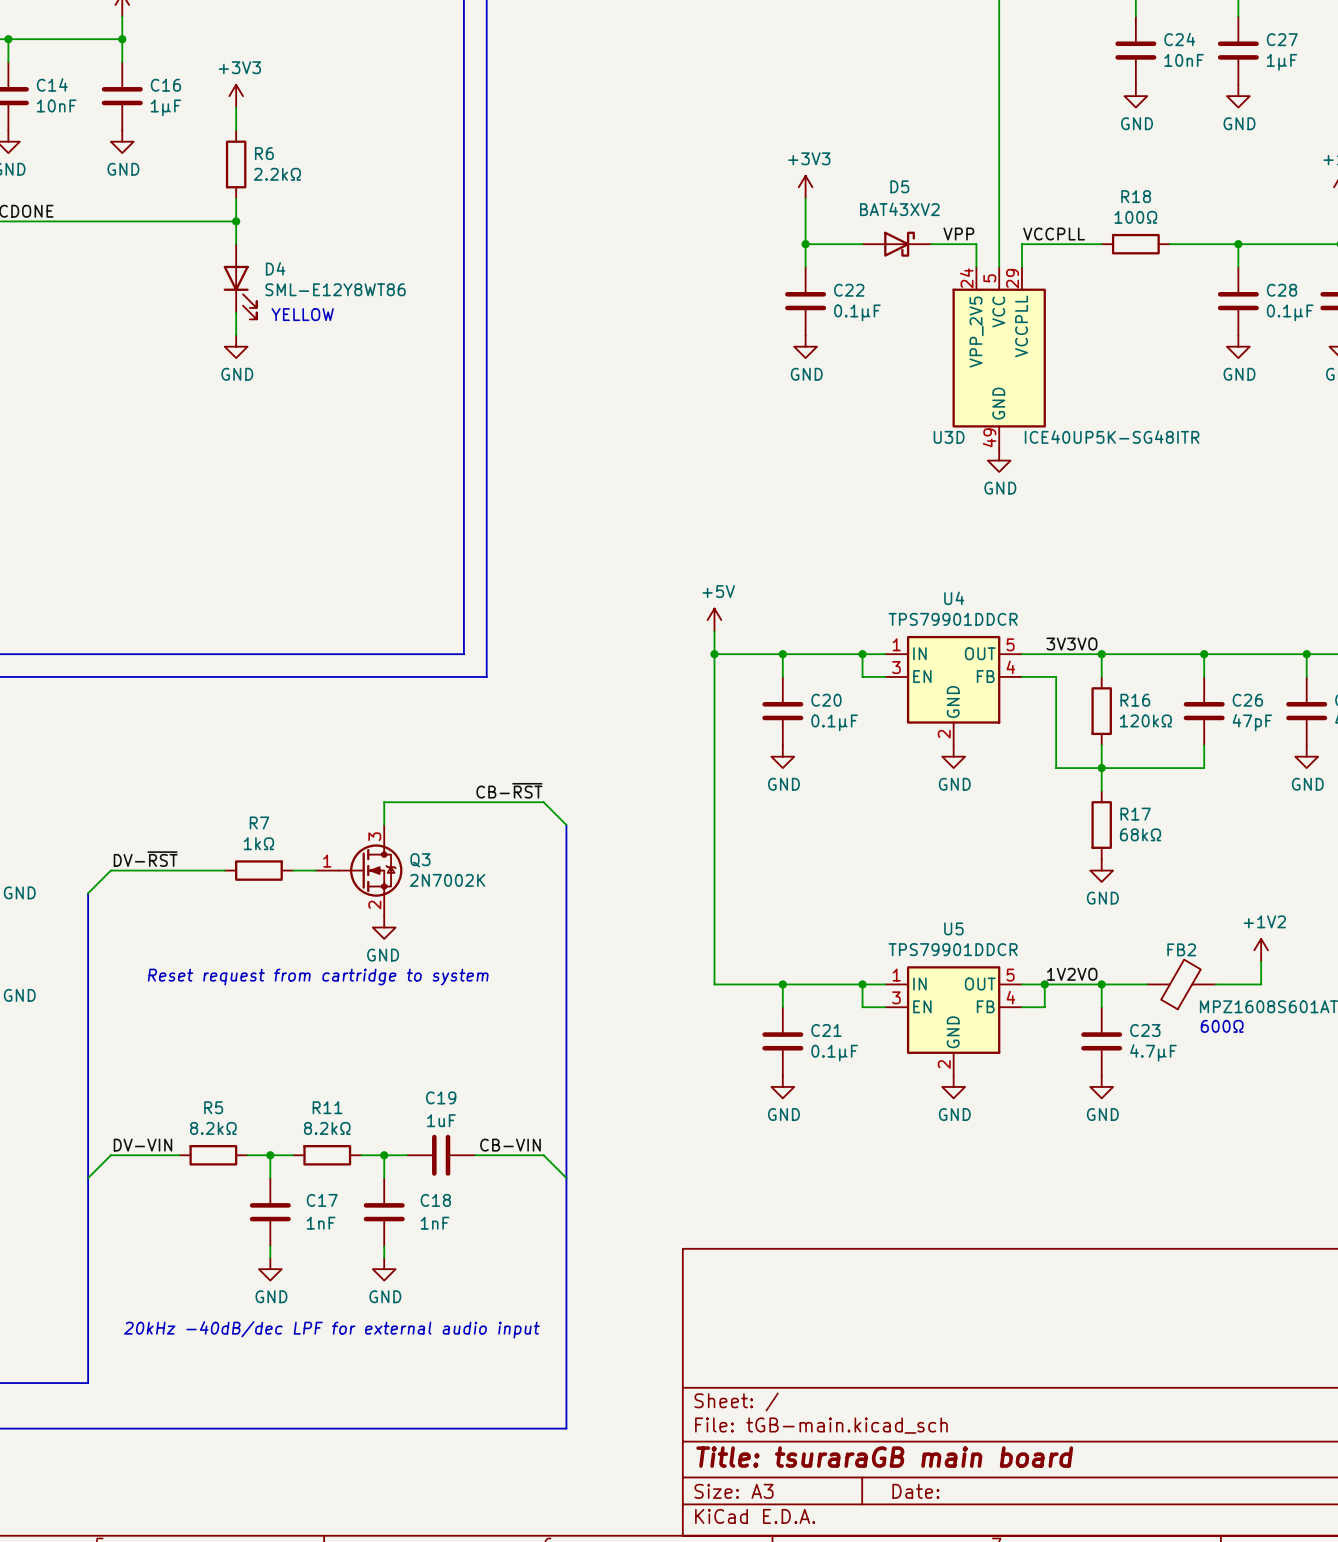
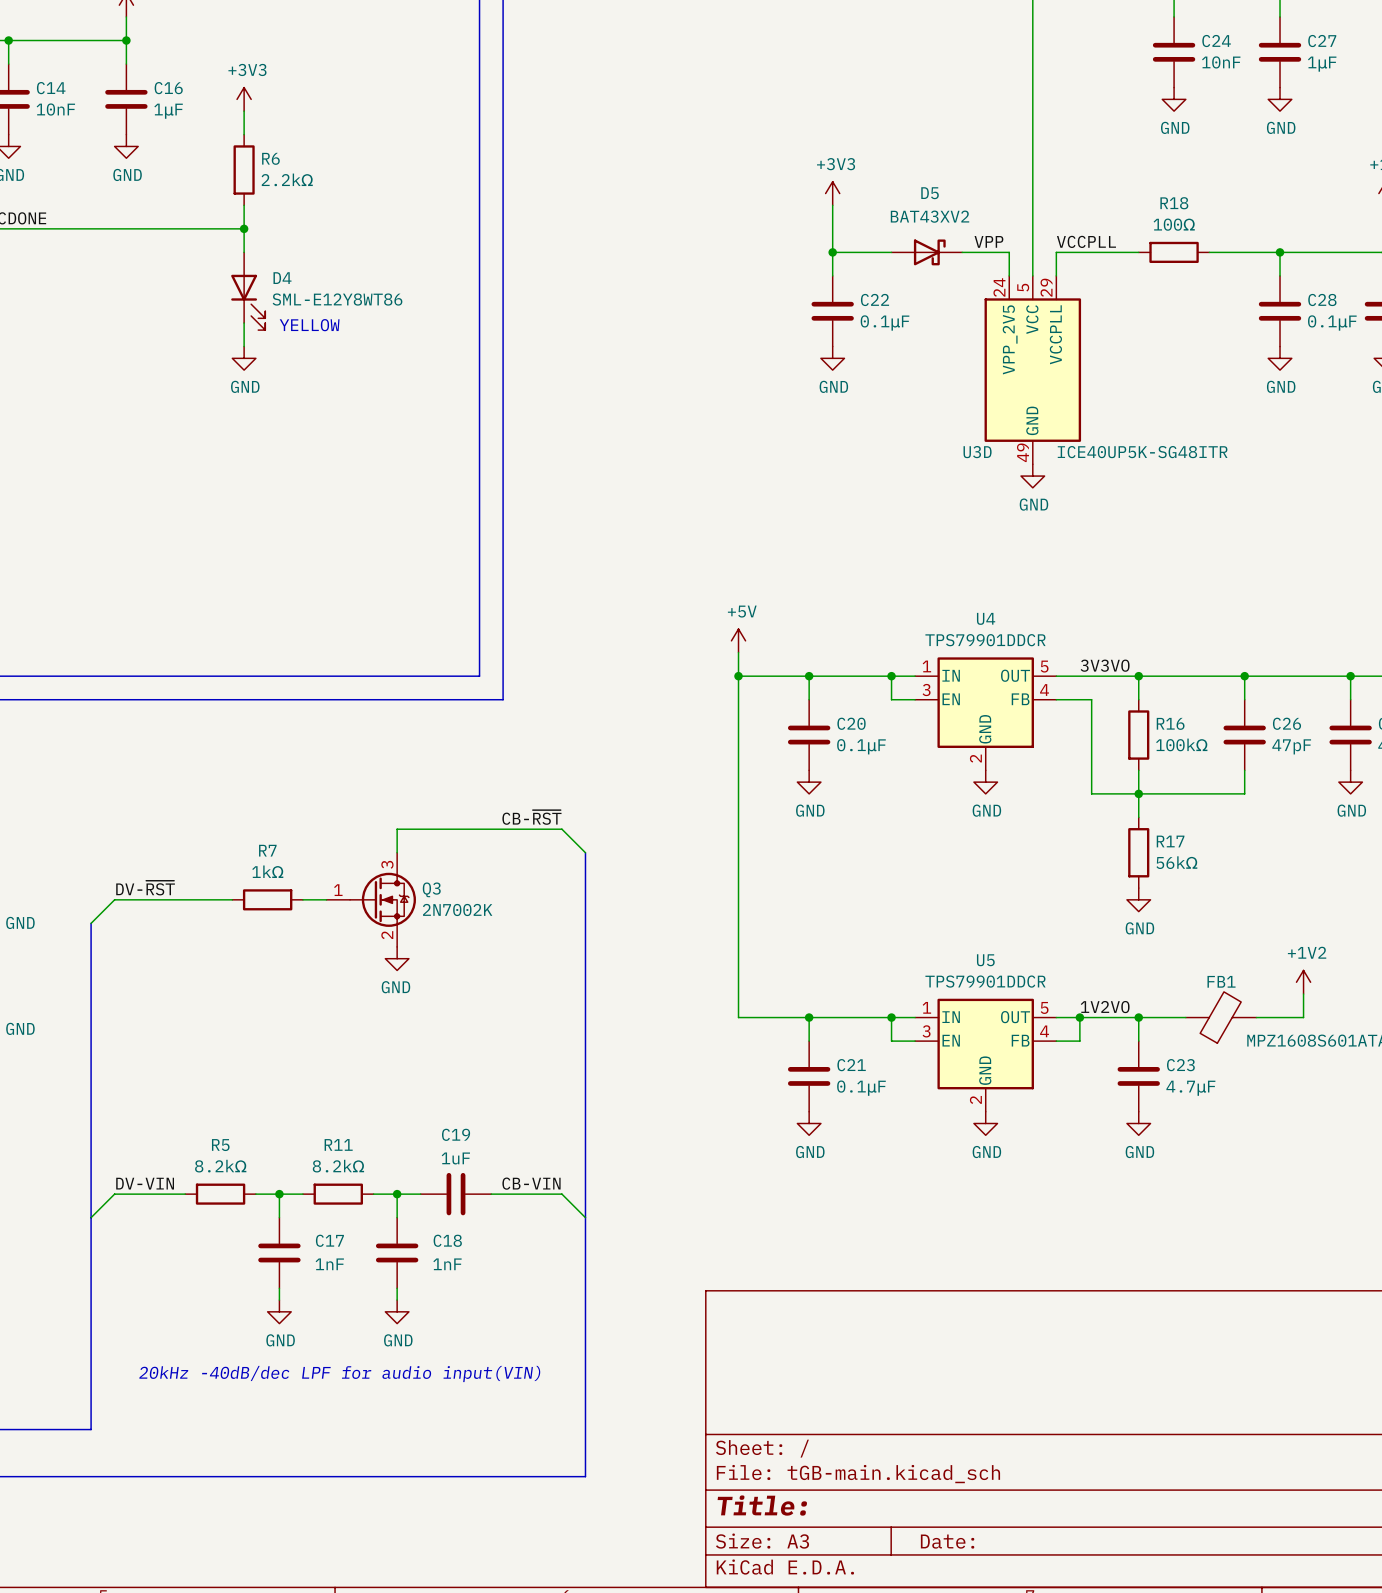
R16 value: 120kΩ (1145, 720) -> 100kΩ (1181, 744)
R17 value: 68kΩ (1140, 834) -> 56kΩ (1176, 862)
FB2 name: FB2 (1181, 949) -> FB1 (1221, 981)
text: Reset request from cartridge to system (318, 977) -> none
text: 600Ω (1222, 1026) -> none
text: 20kHz -40dB/dec LPF for external audio input (331, 1329) -> 20kHz -40dB/dec LPF for audio input(VIN) (339, 1373)
title block: Title: tsuraraGB main board (884, 1457) -> Title: (762, 1505)

